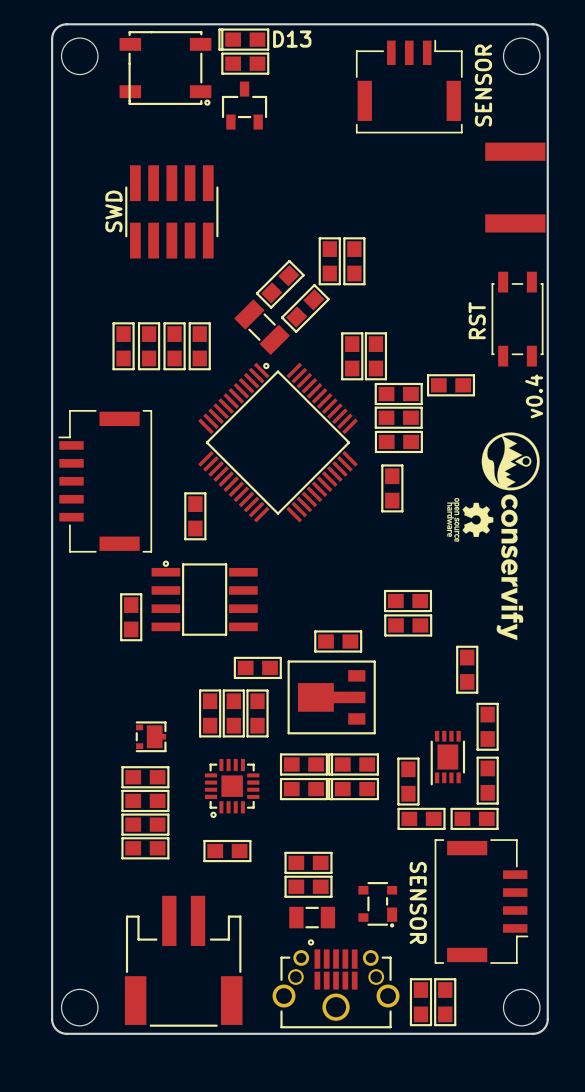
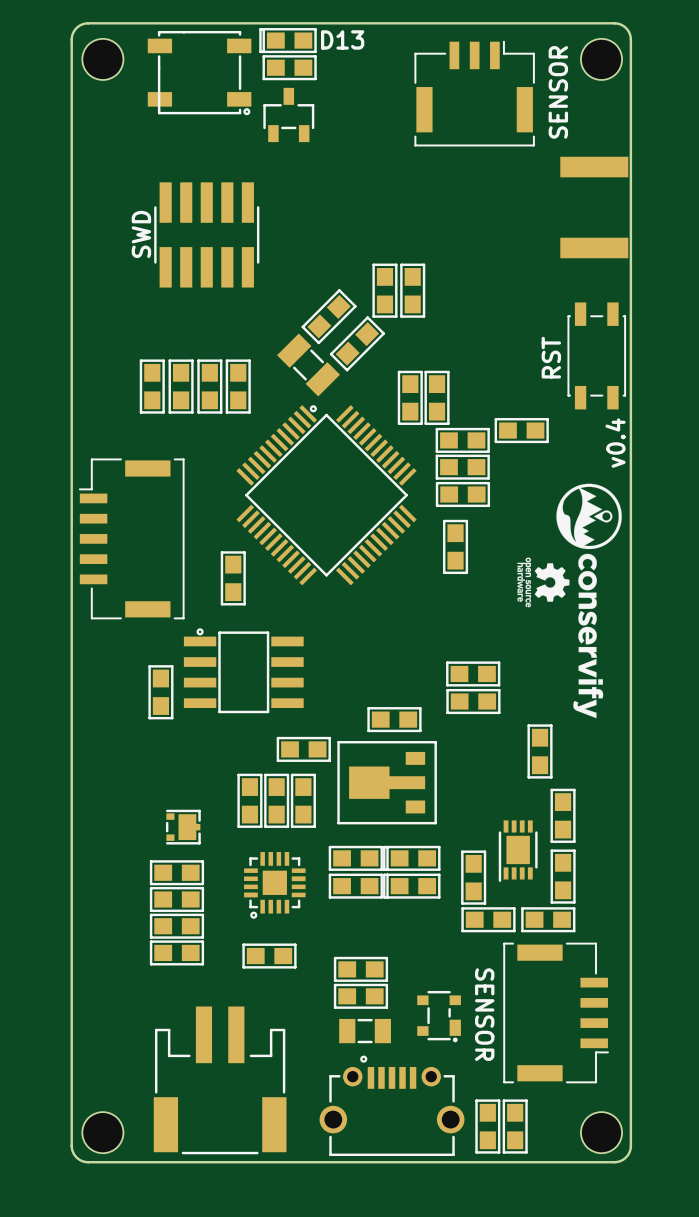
part footprint: [272, 939, 400, 1029] -> [319, 1055, 465, 1157]

